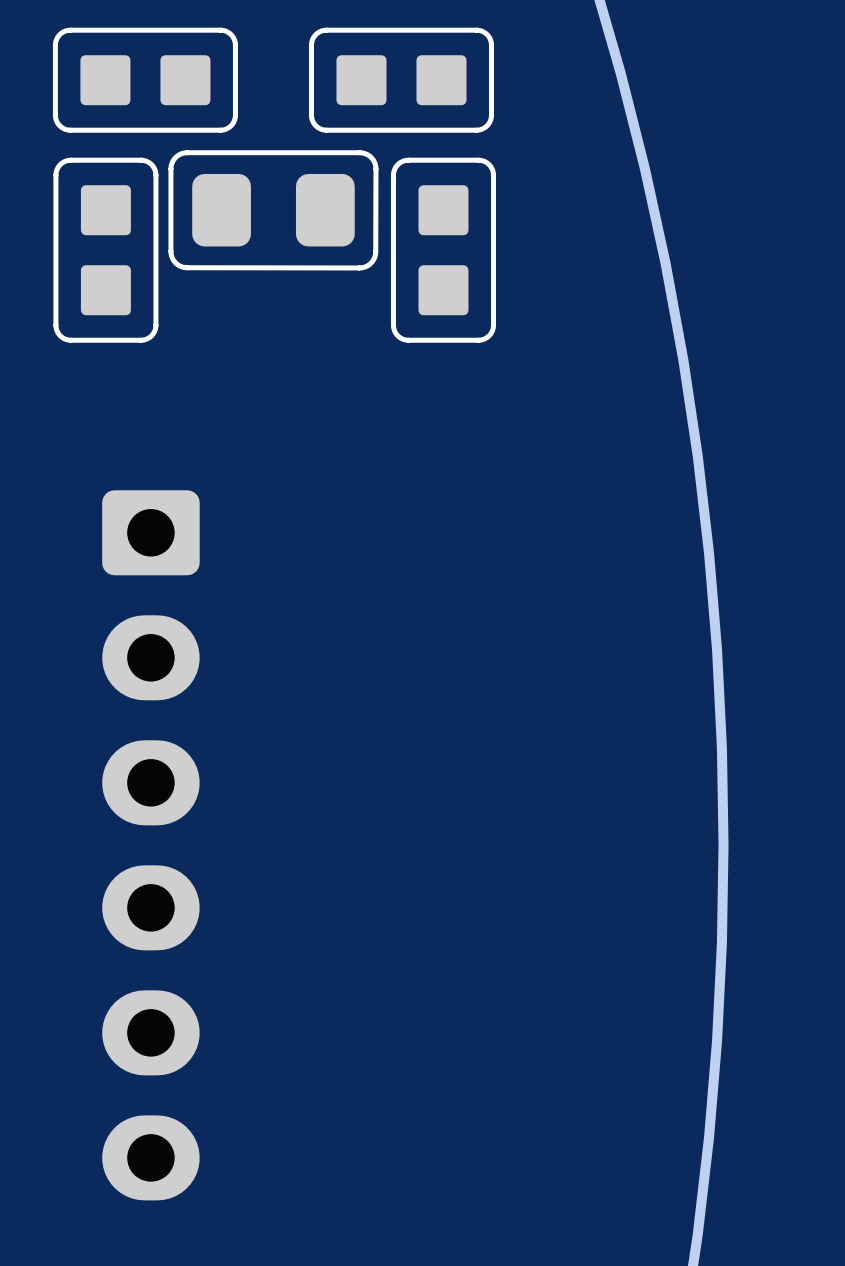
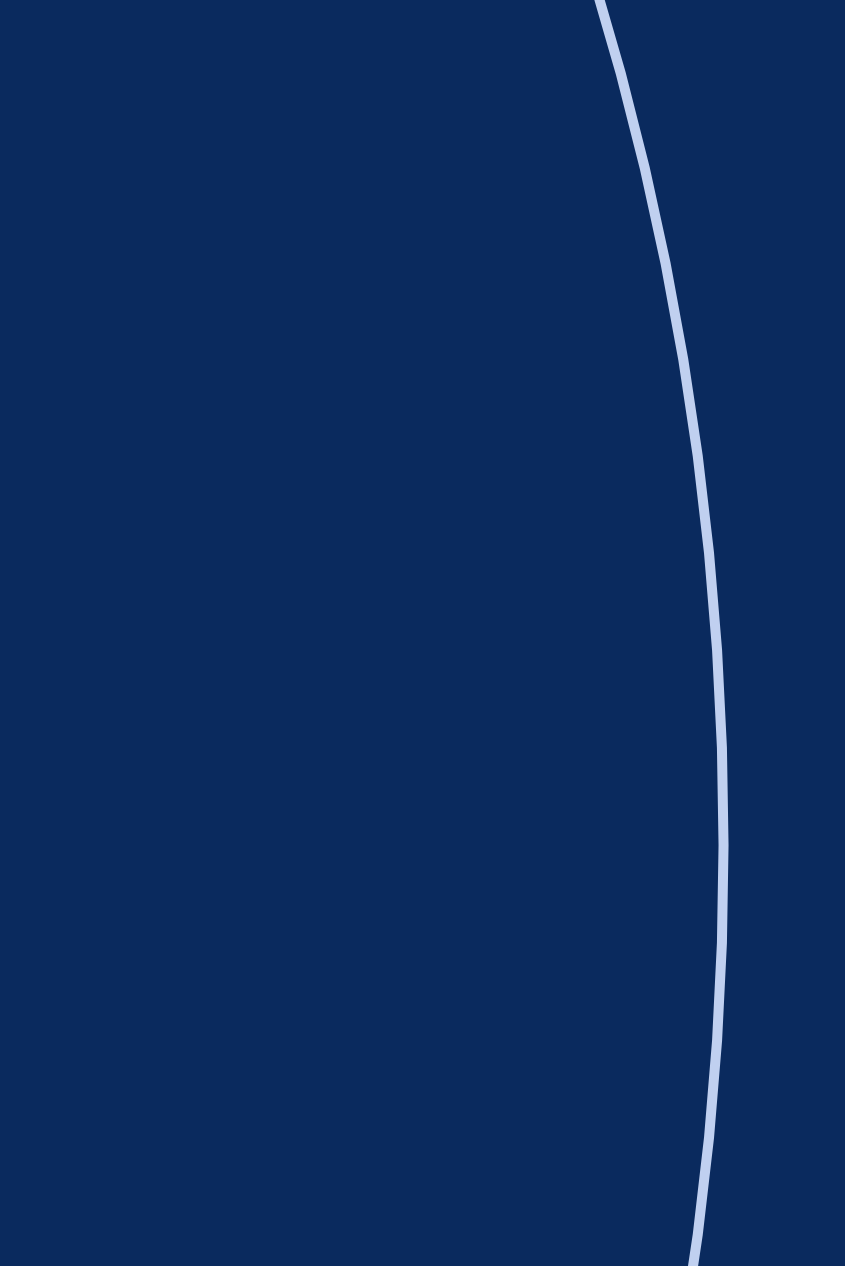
part: (145, 80) -> none
part: (401, 80) -> none
part: (273, 210) -> none
part: (105, 250) -> none
part: (443, 250) -> none
part: (150, 845) -> none

